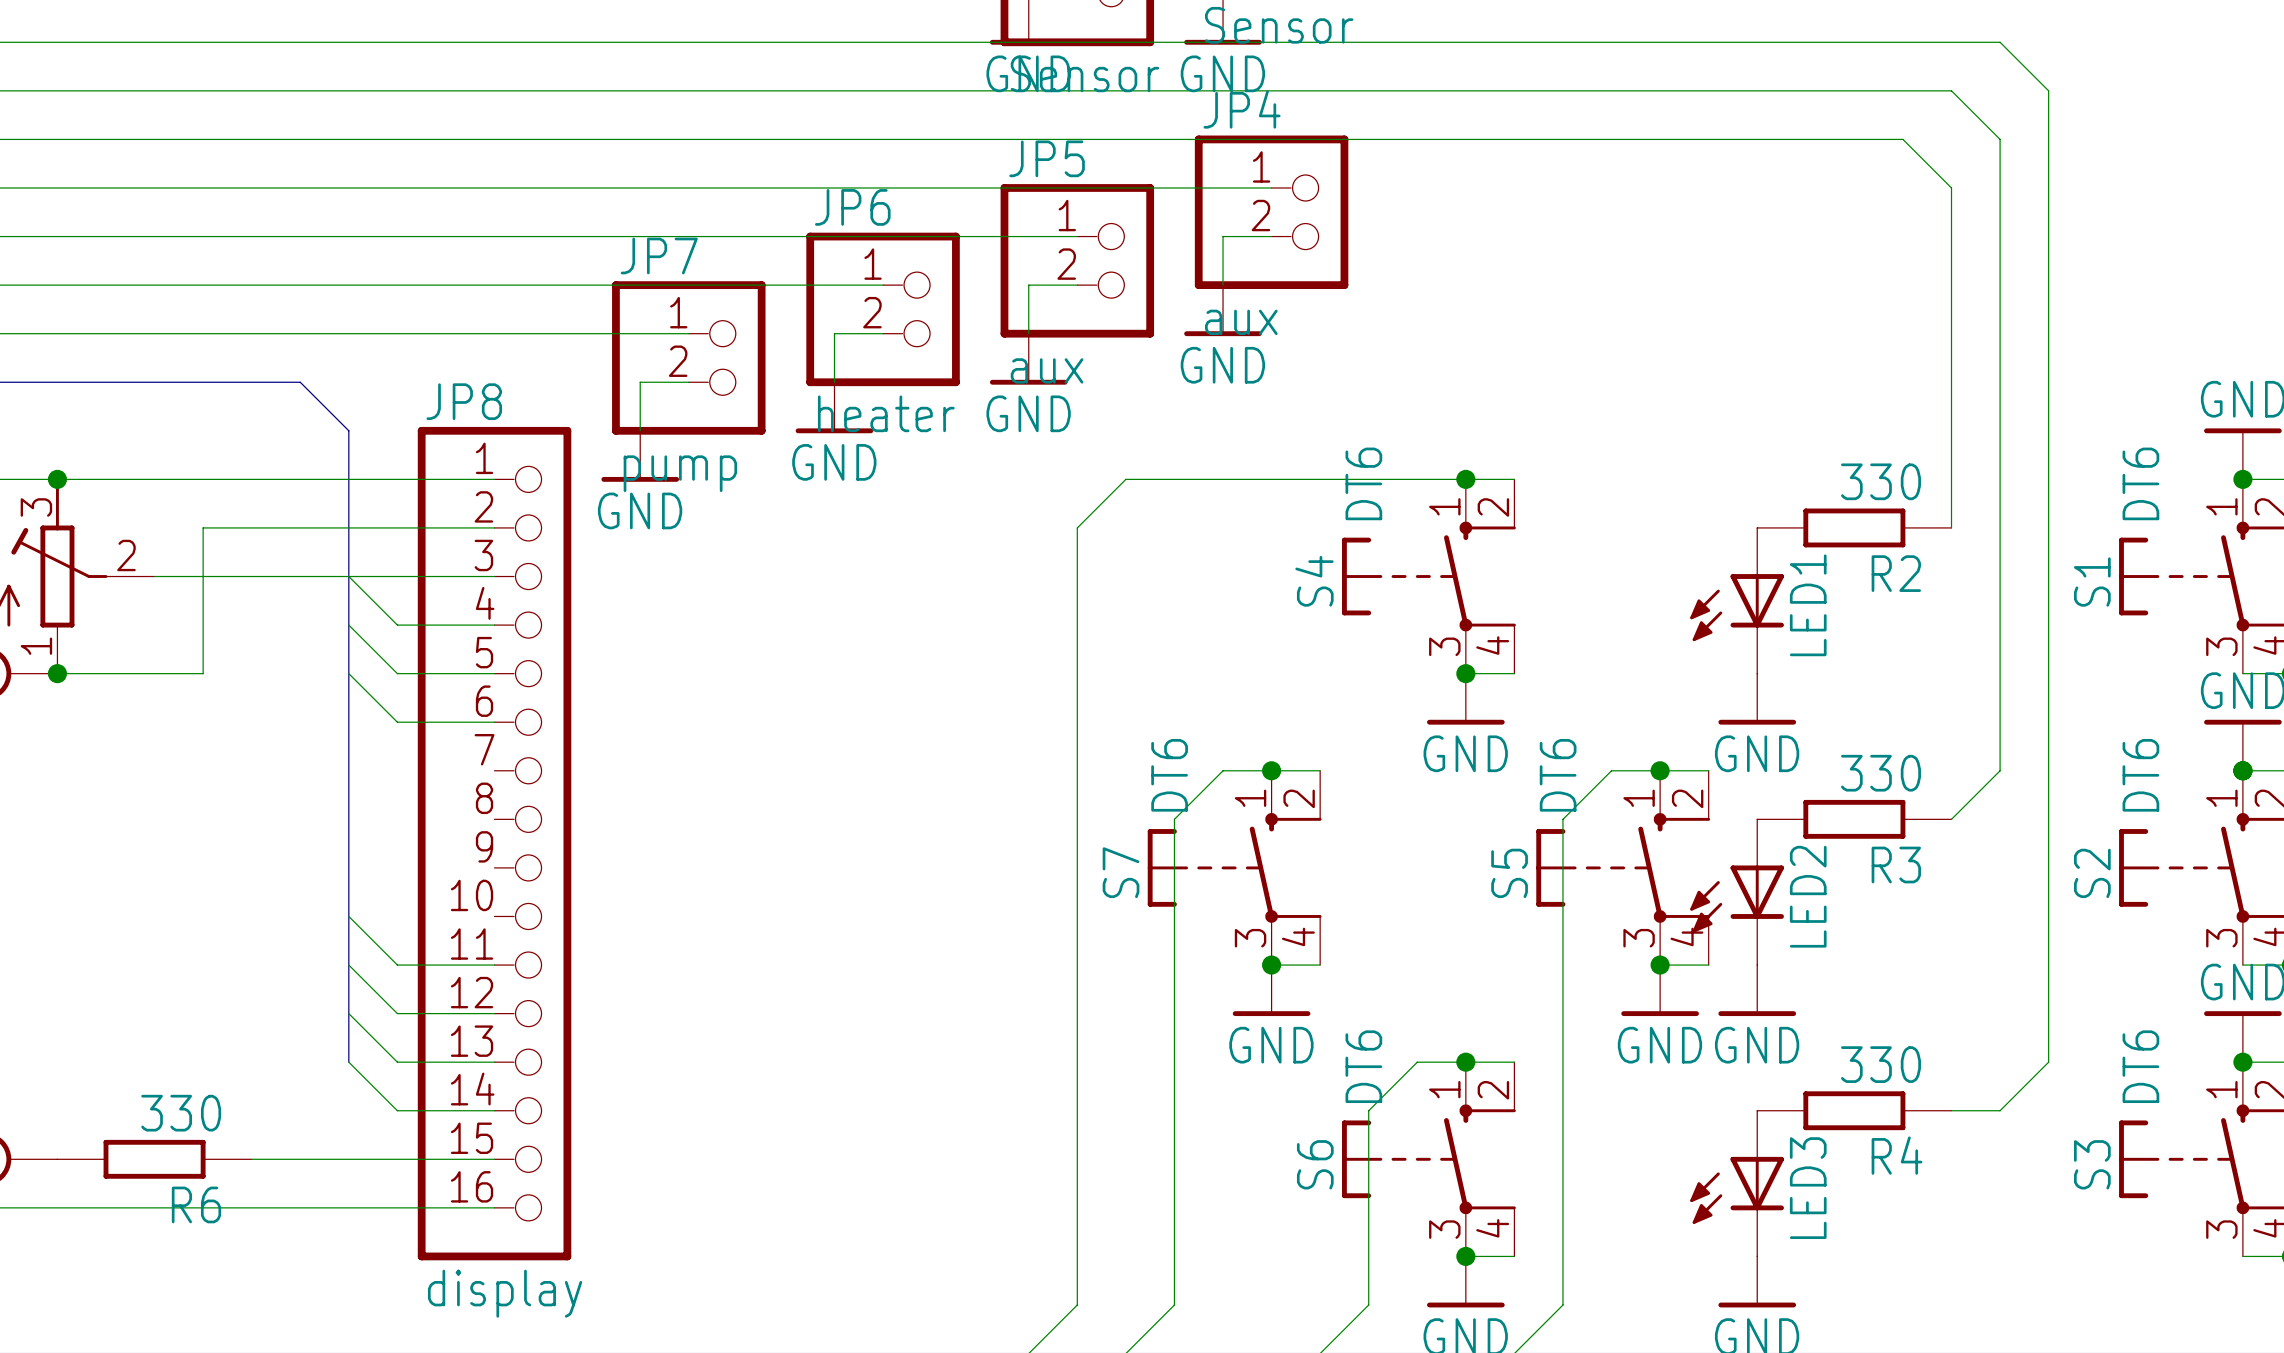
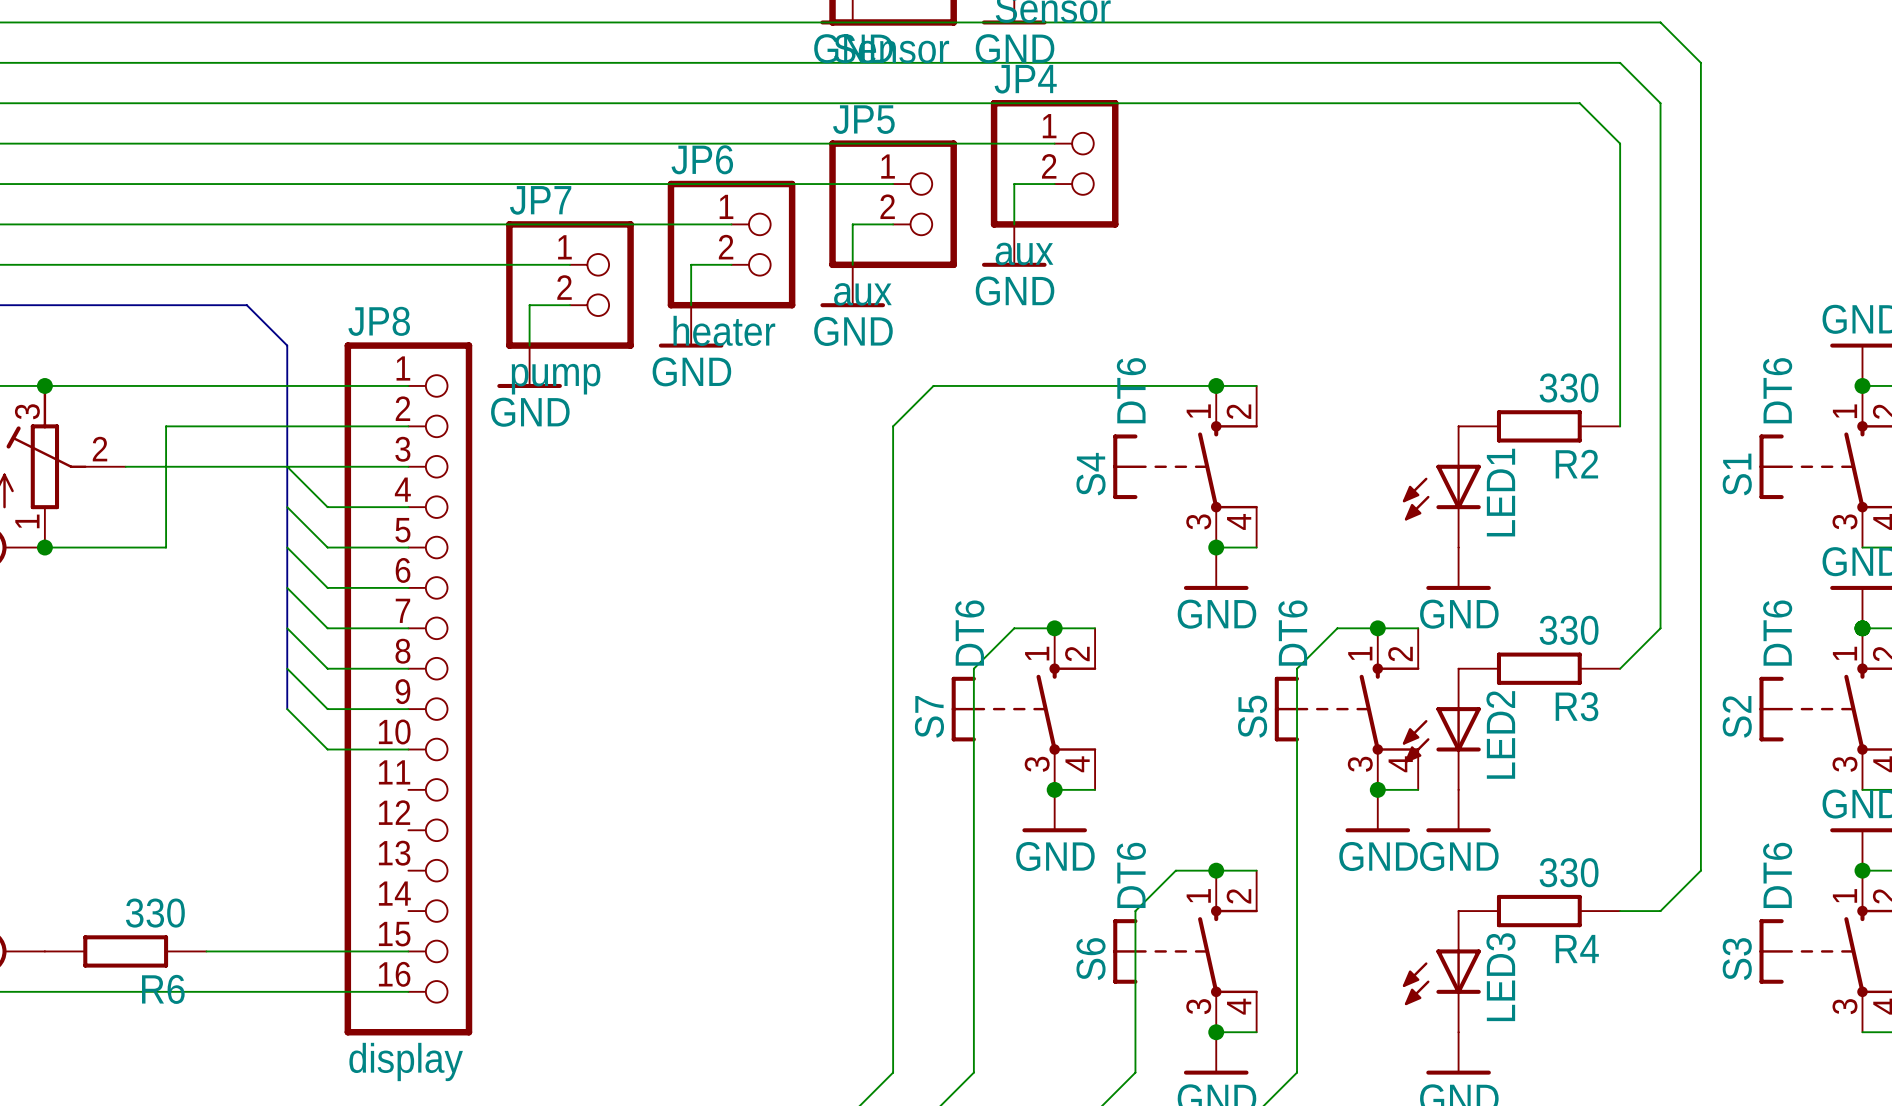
bus: (348, 867) (348, 1062) -> none
wire: (348, 916) (397, 965) (494, 965) -> (287, 709) (327, 749) (408, 749)
wire: (348, 965) (397, 1013) (494, 1013) -> (287, 668) (327, 709) (408, 709)
wire: (348, 1013) (397, 1062) (494, 1062) -> (287, 628) (327, 668) (408, 668)
wire: (348, 1062) (397, 1110) (494, 1110) -> (287, 587) (327, 628) (408, 628)

